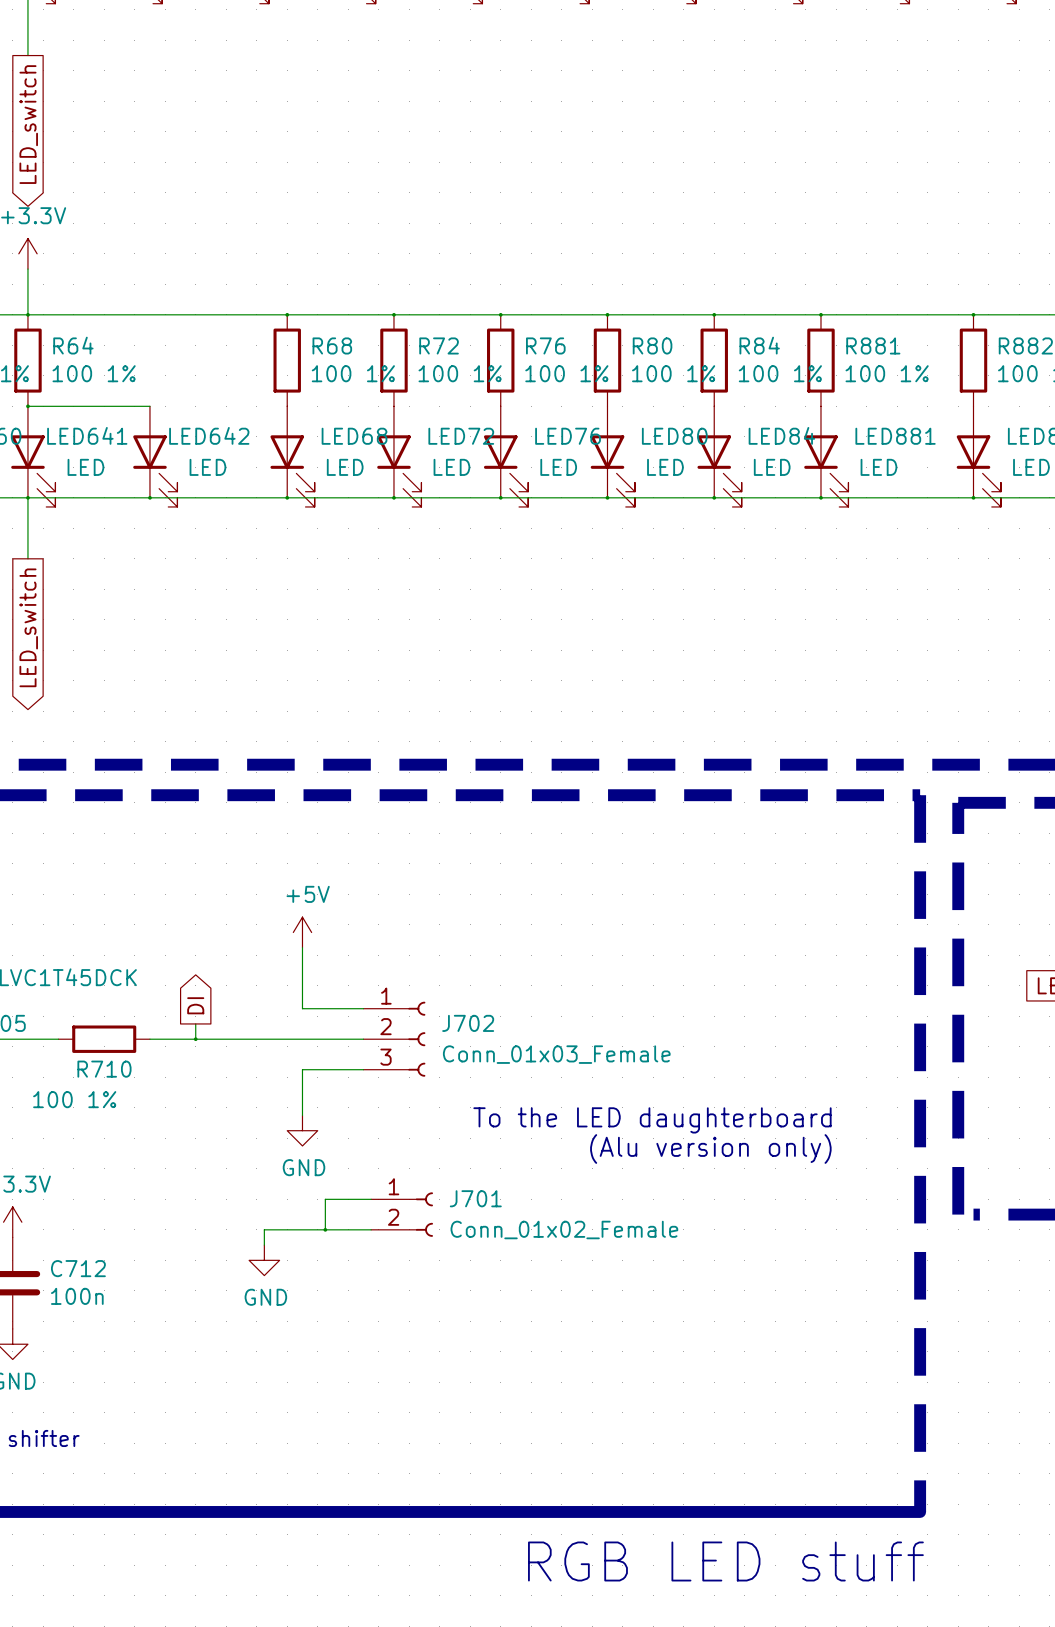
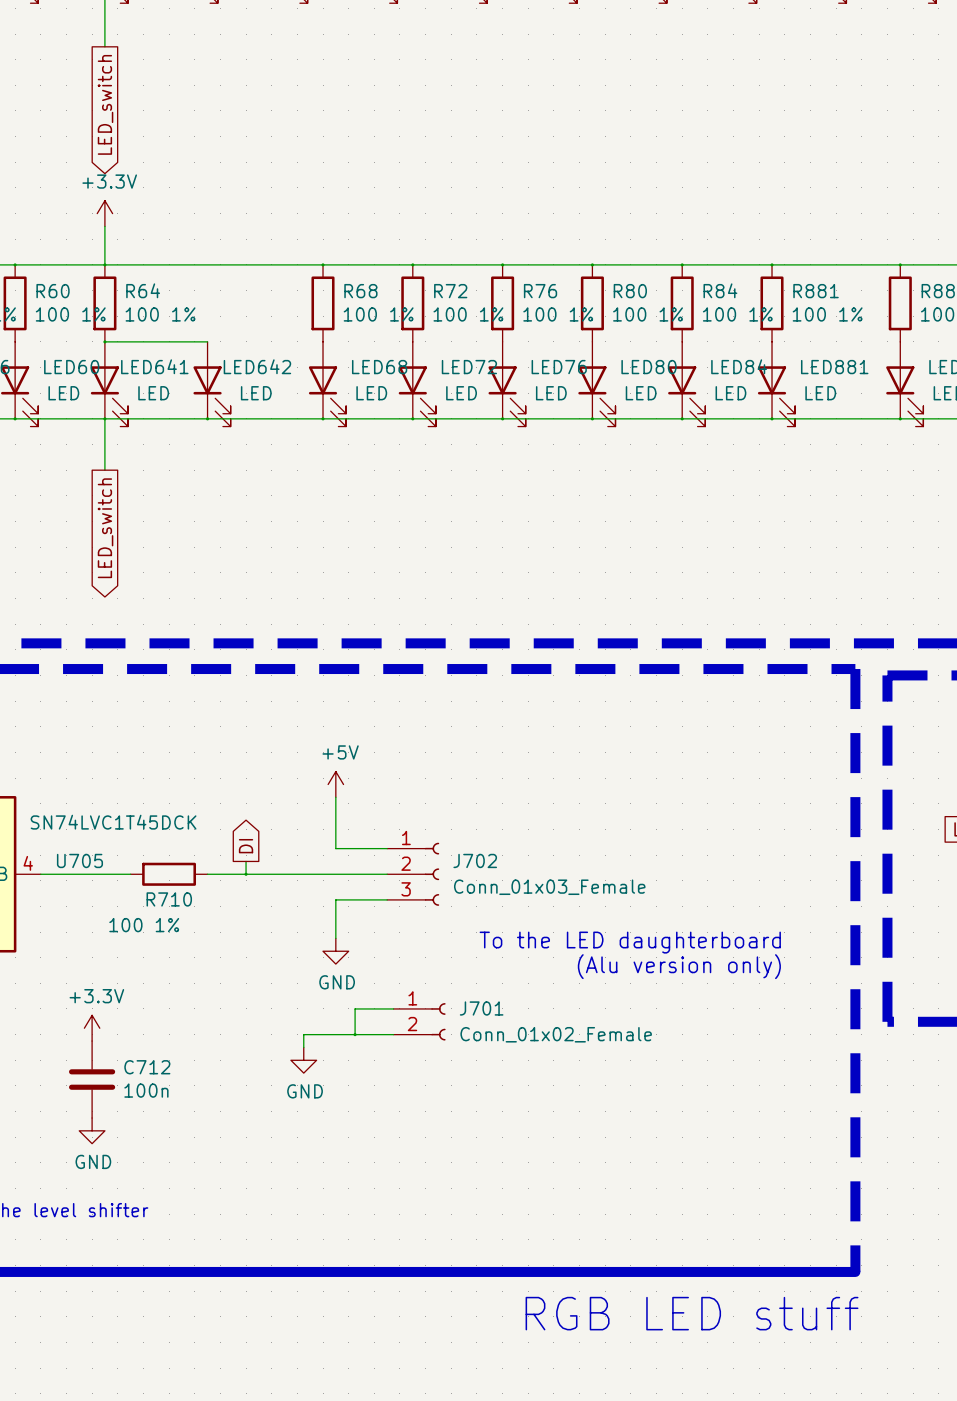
line: none -> (887, 1021) (900, 1021)

